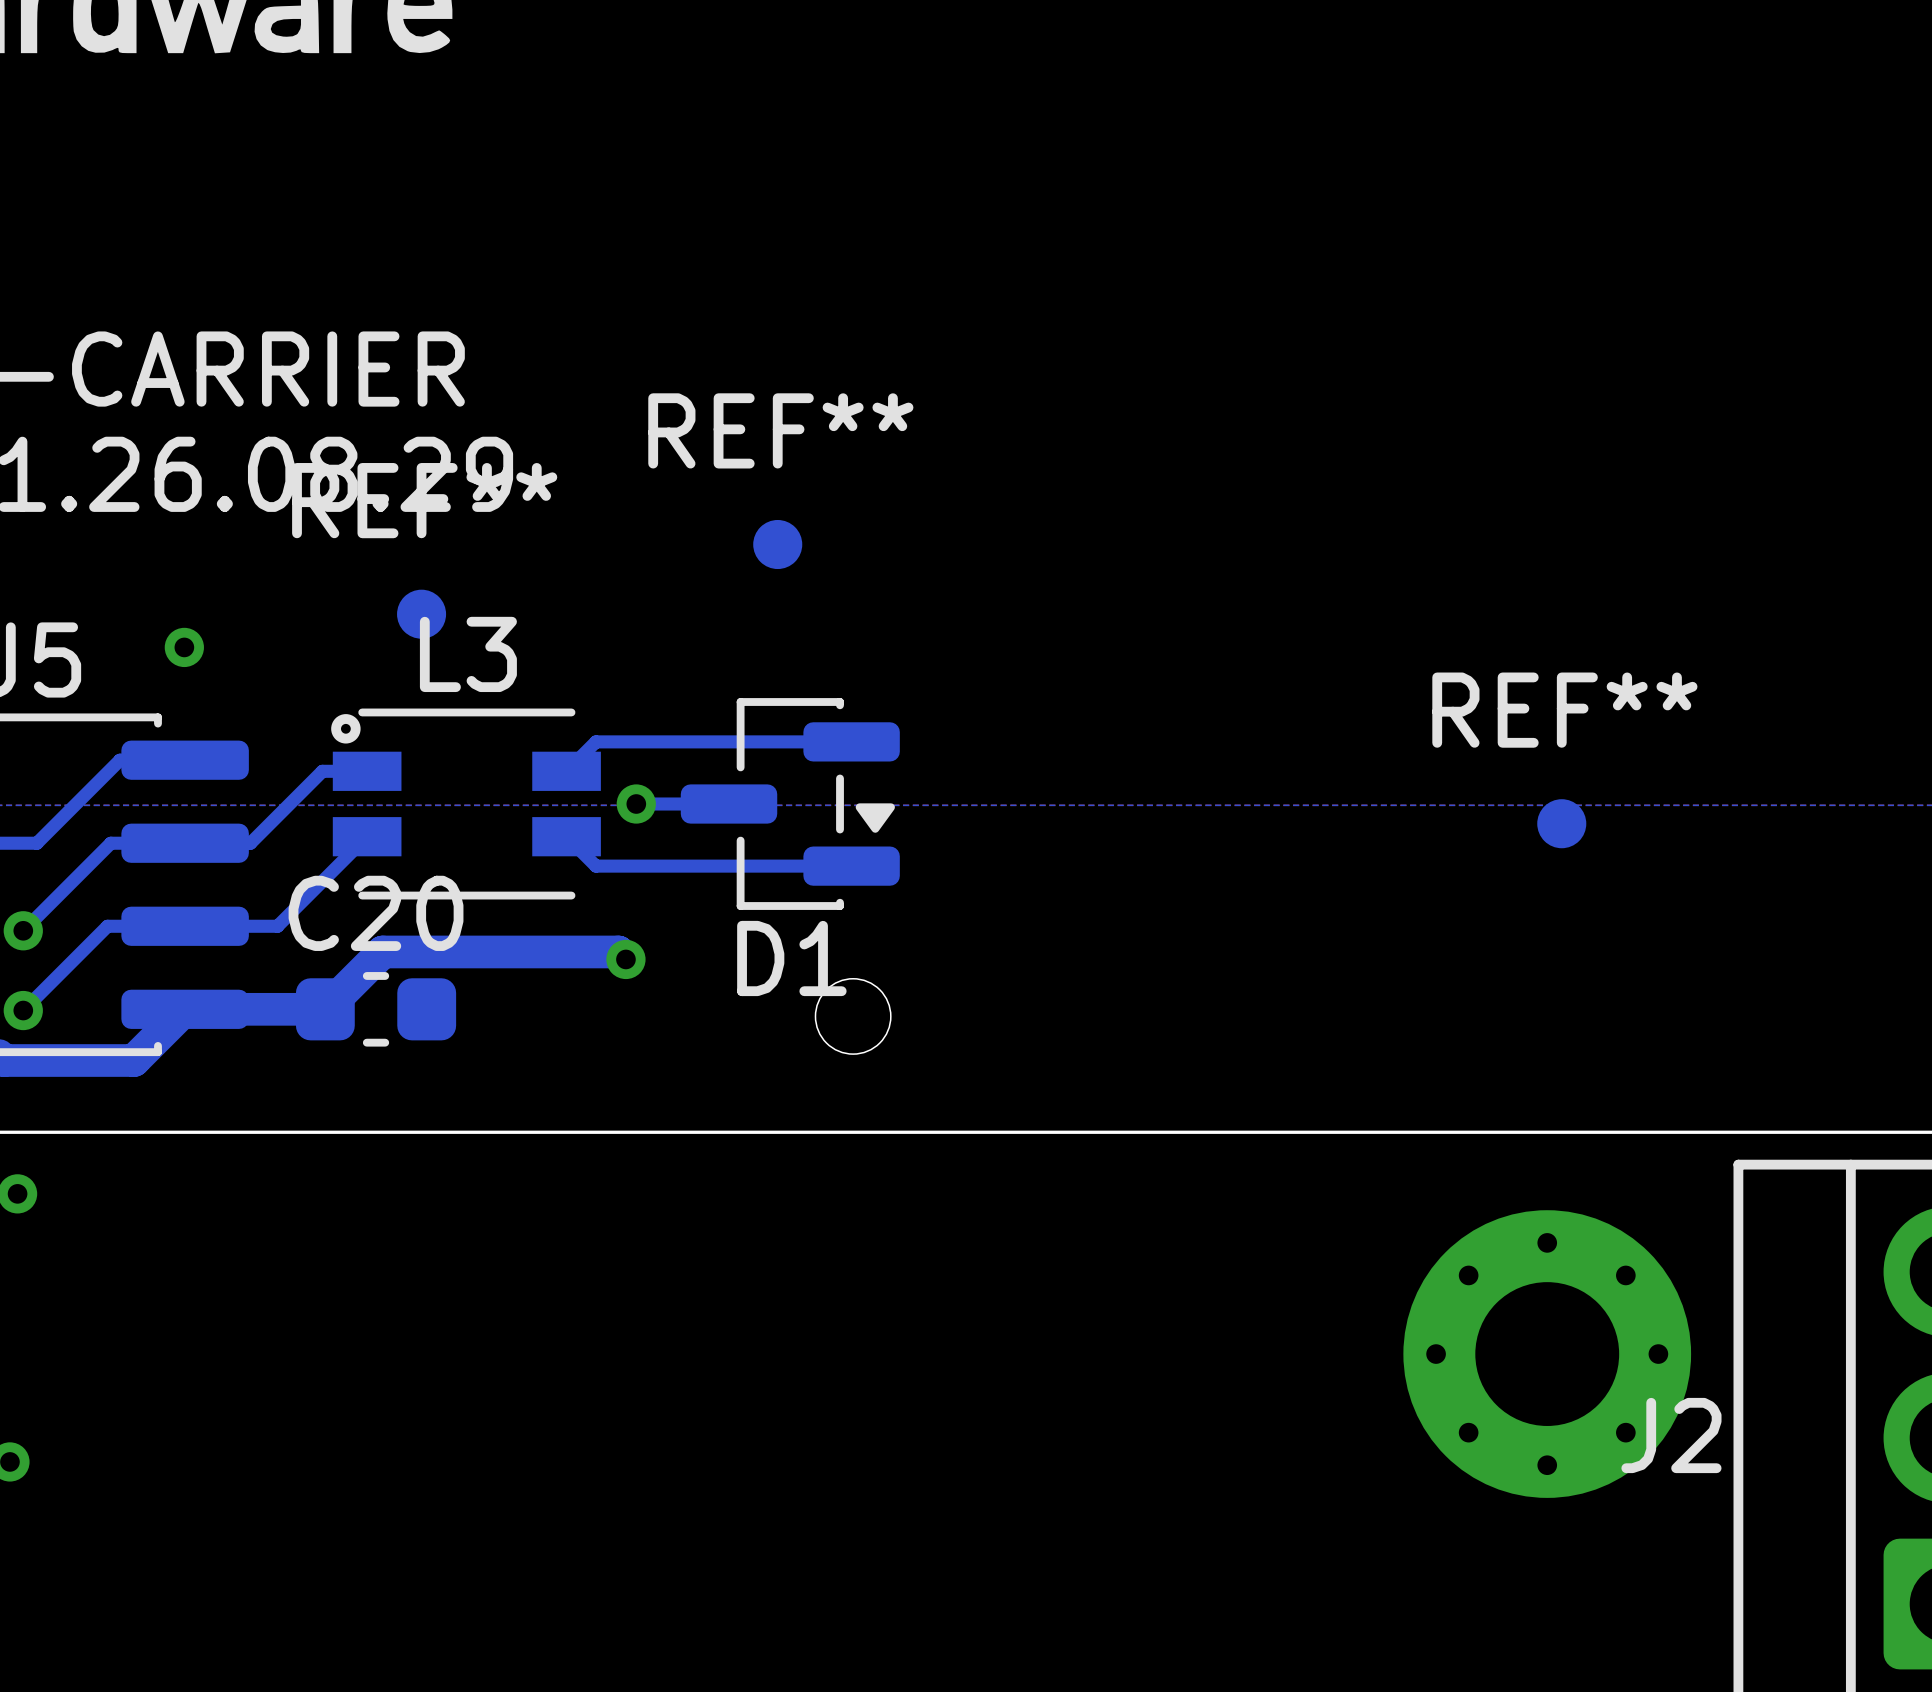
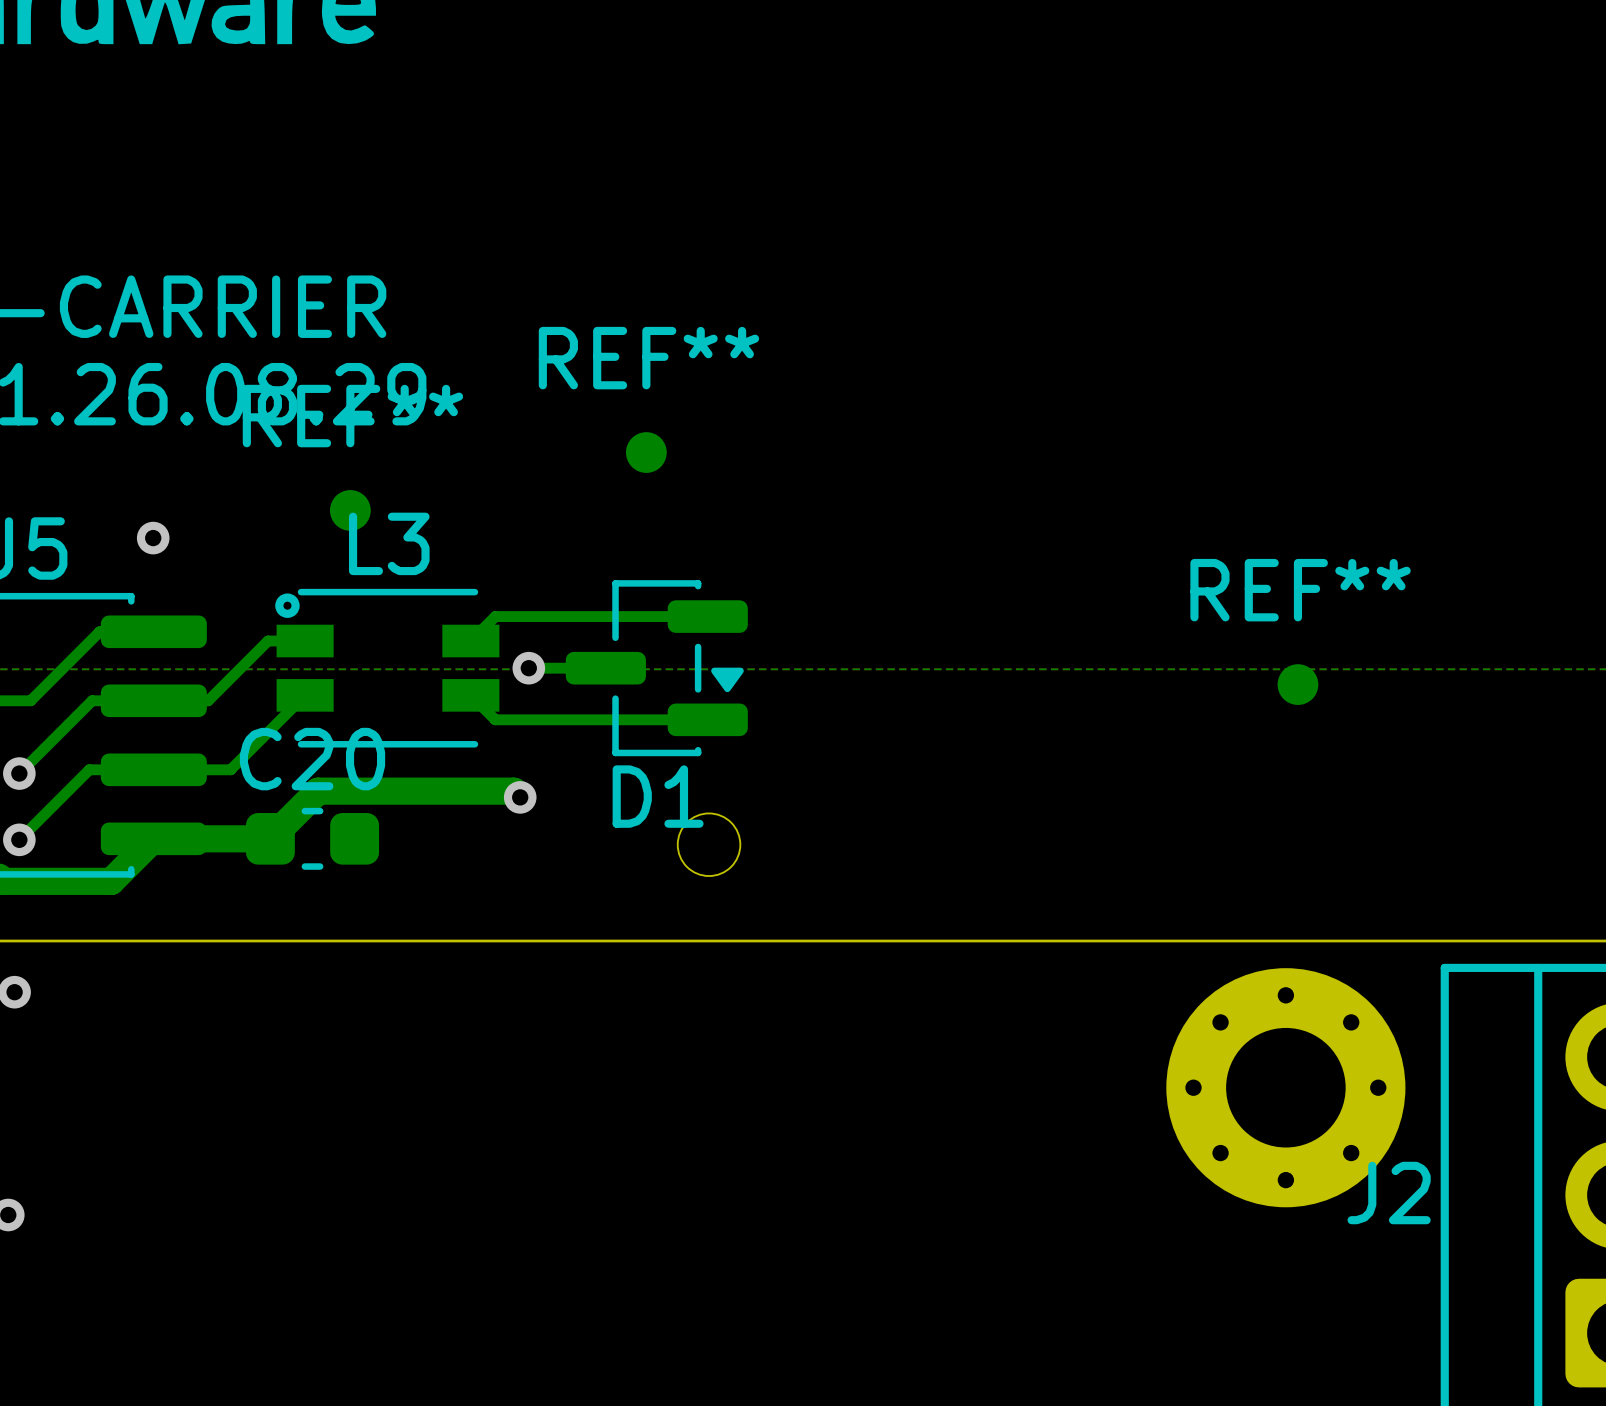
part position: (1547, 1354) -> (1285, 1087)

